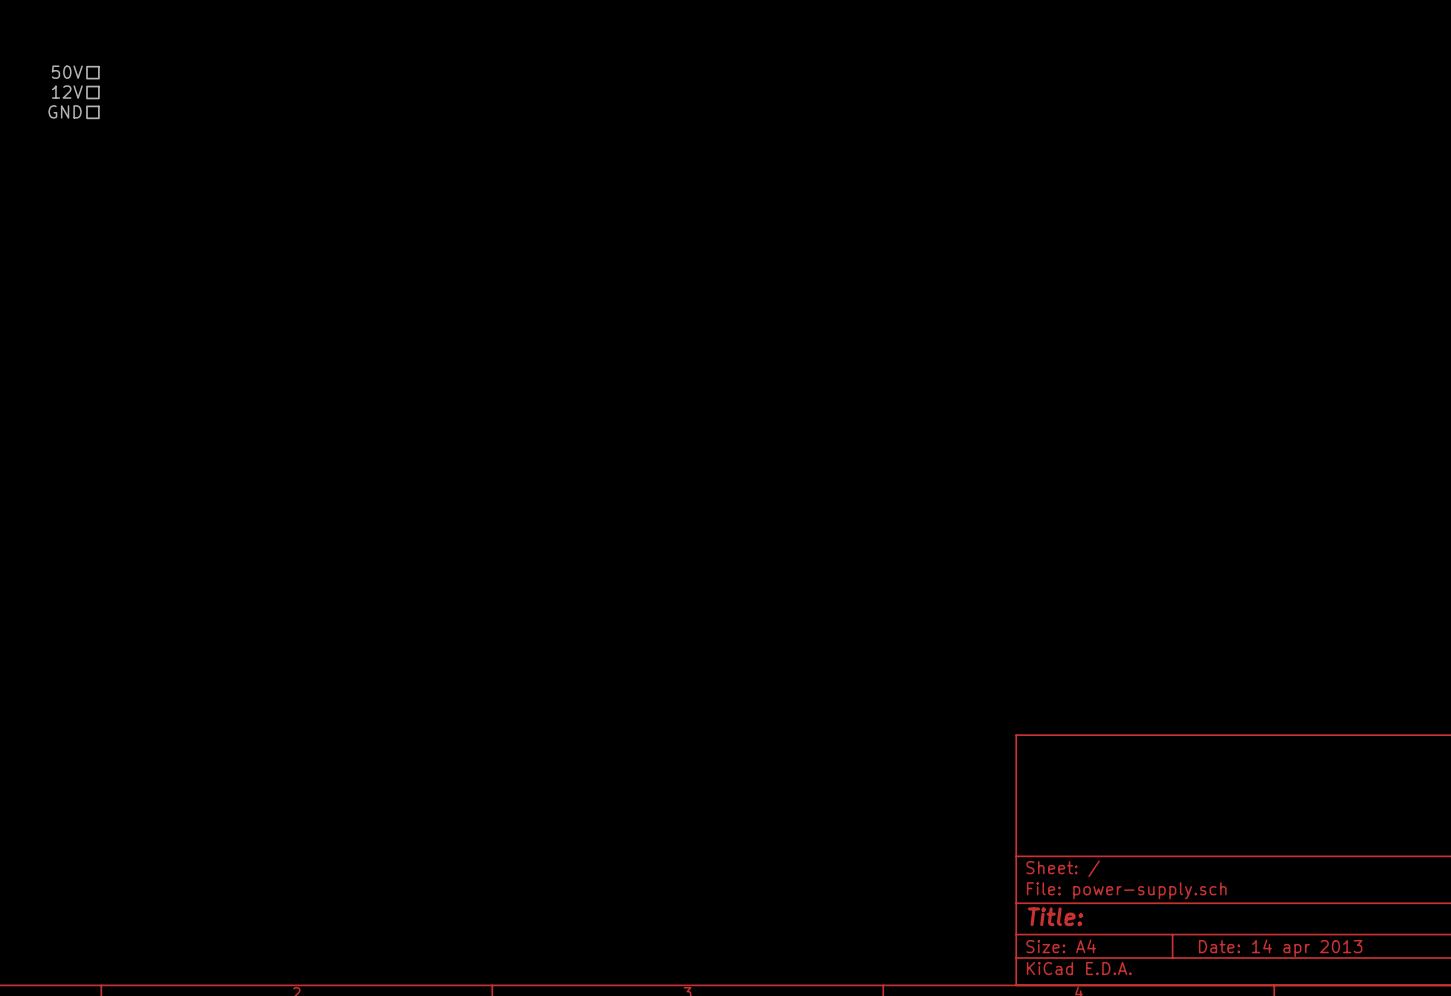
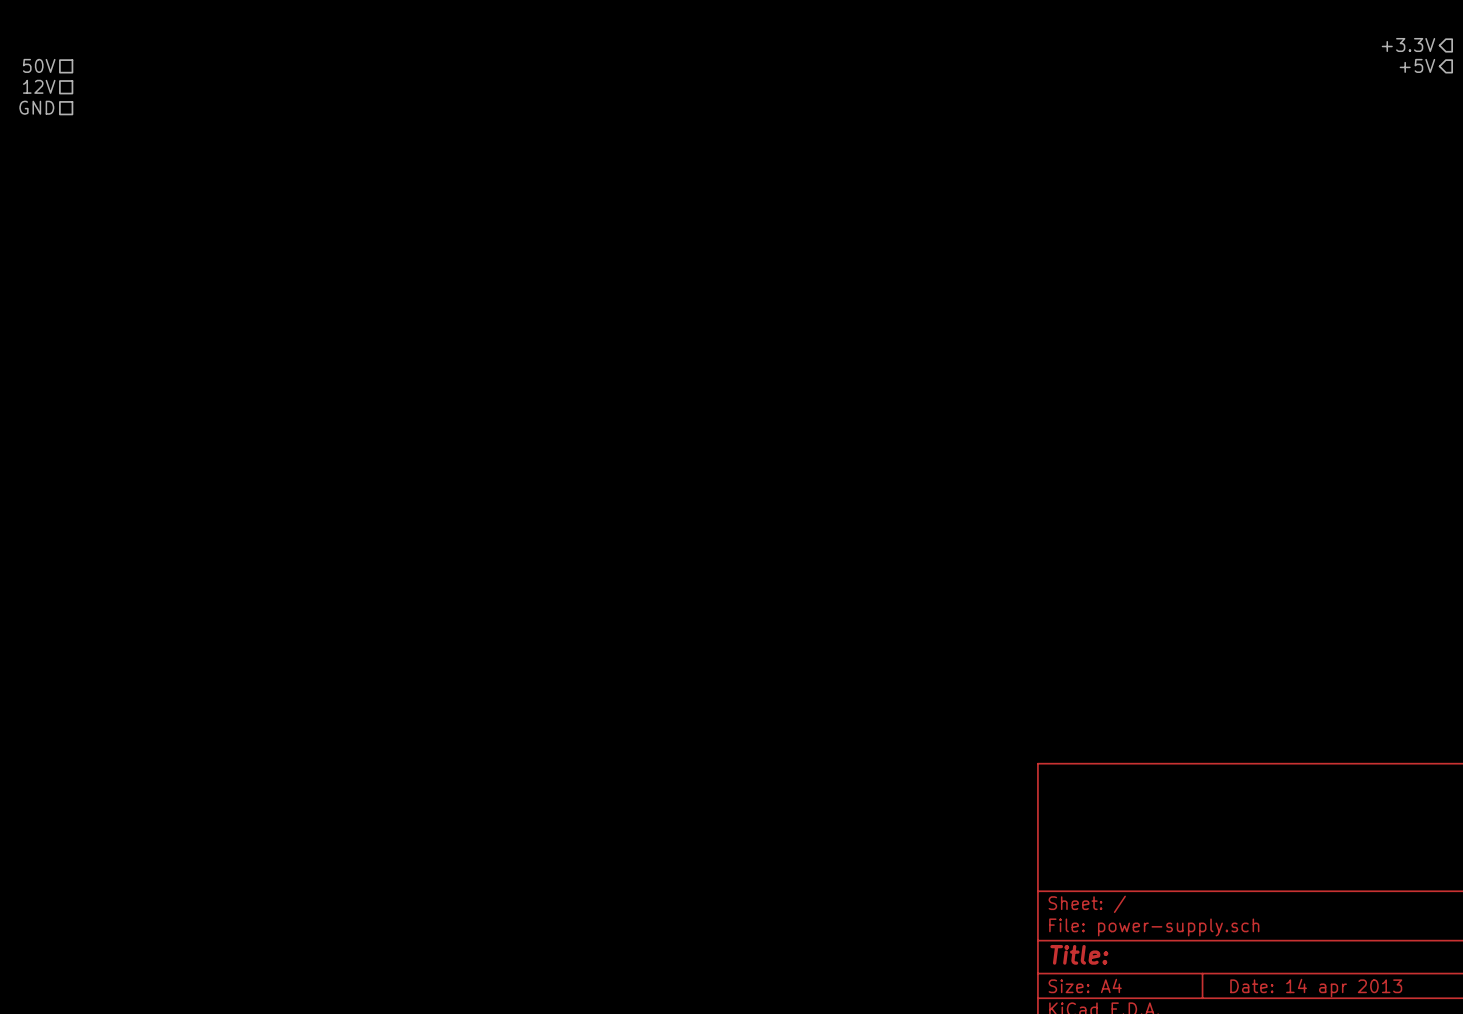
hierarchical label: none -> +3.3V (1408, 45)
hierarchical label: none -> +5V (1417, 65)

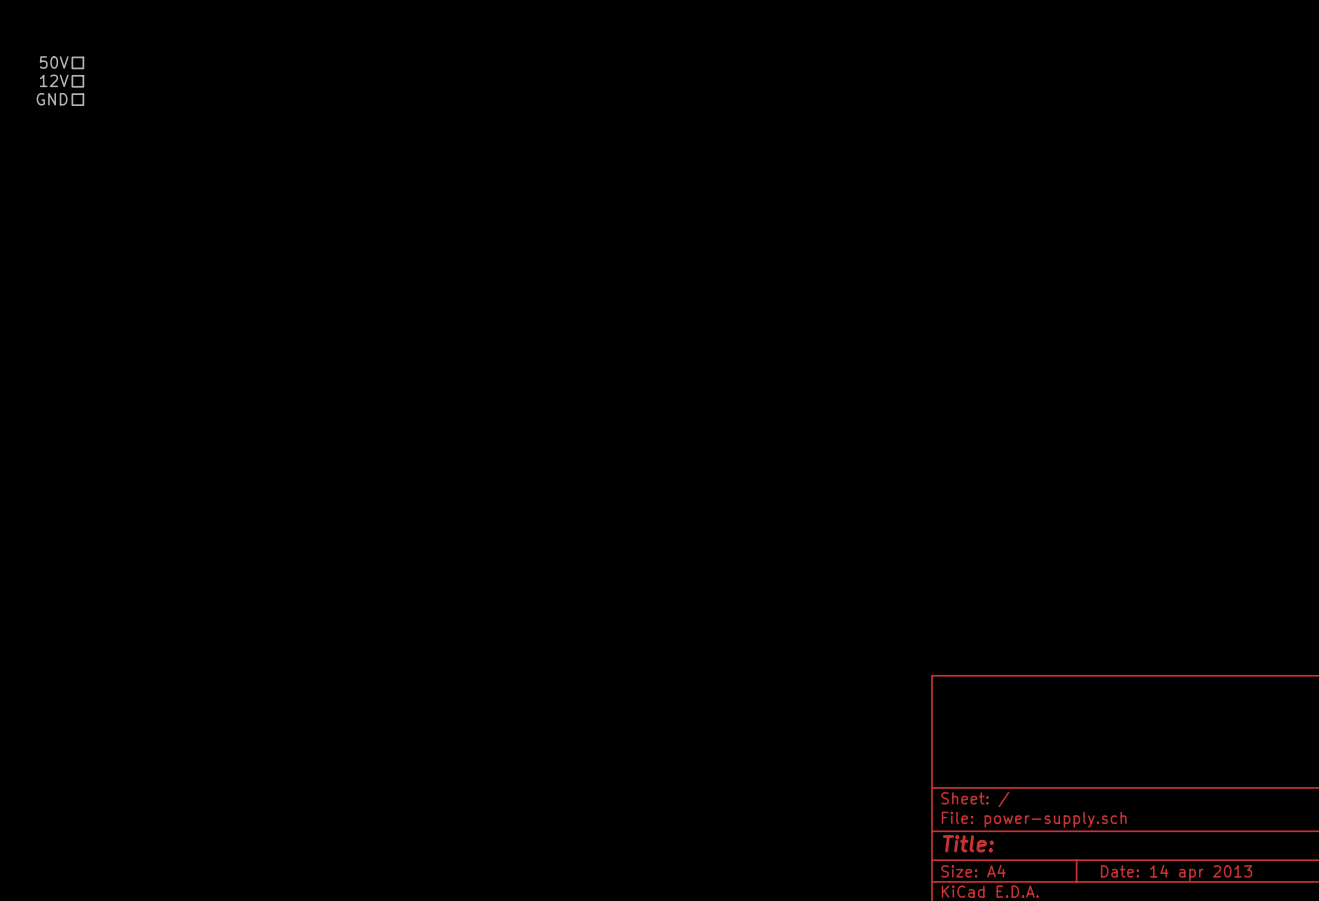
hierarchical label: +3.3V (1408, 45) -> none
hierarchical label: +5V (1417, 65) -> none

